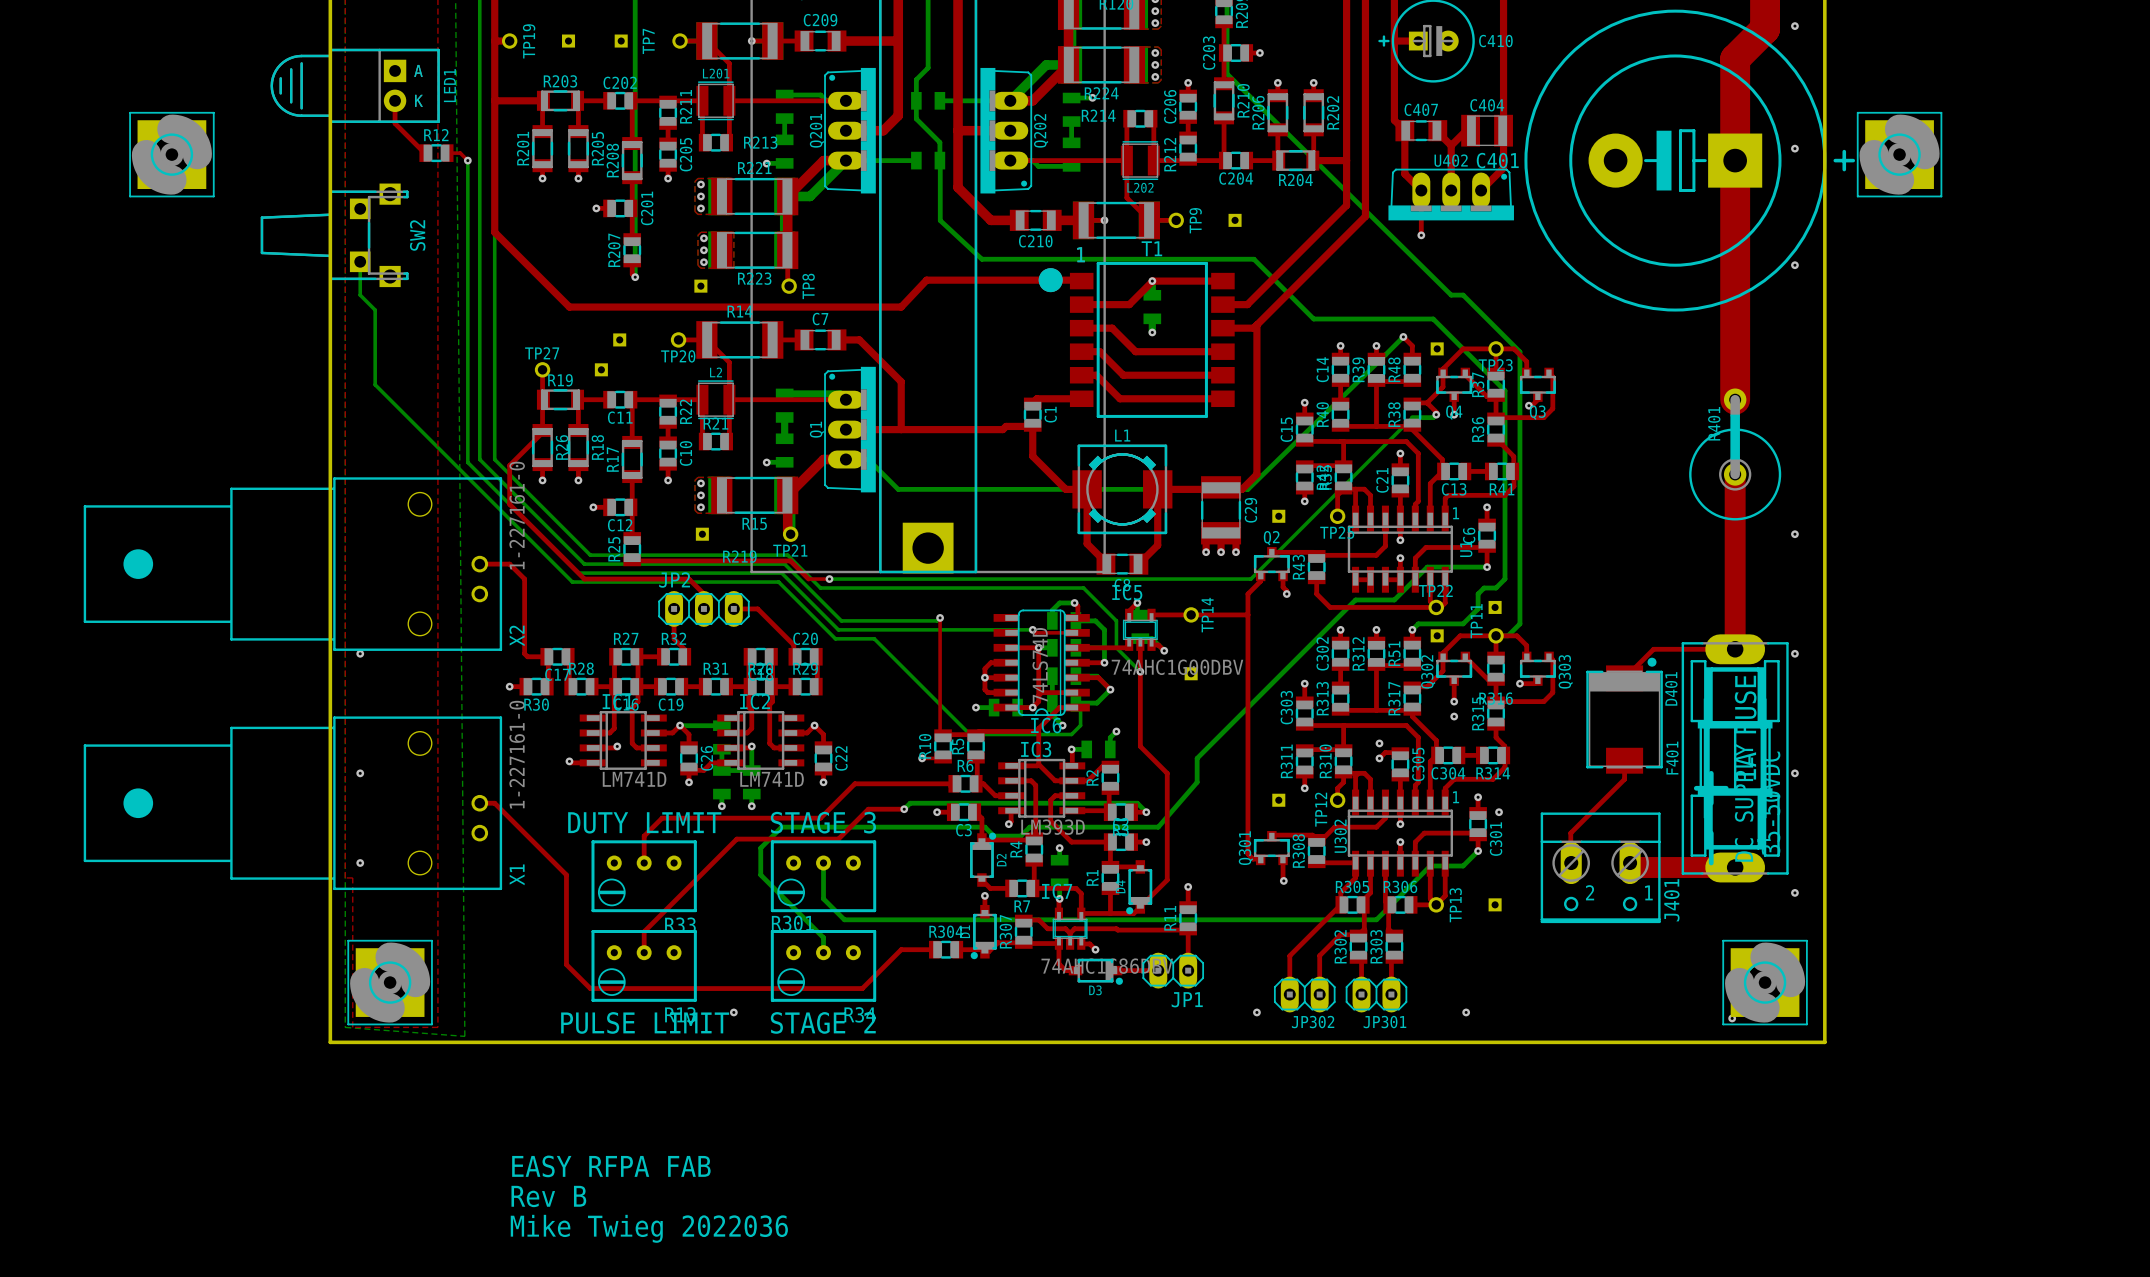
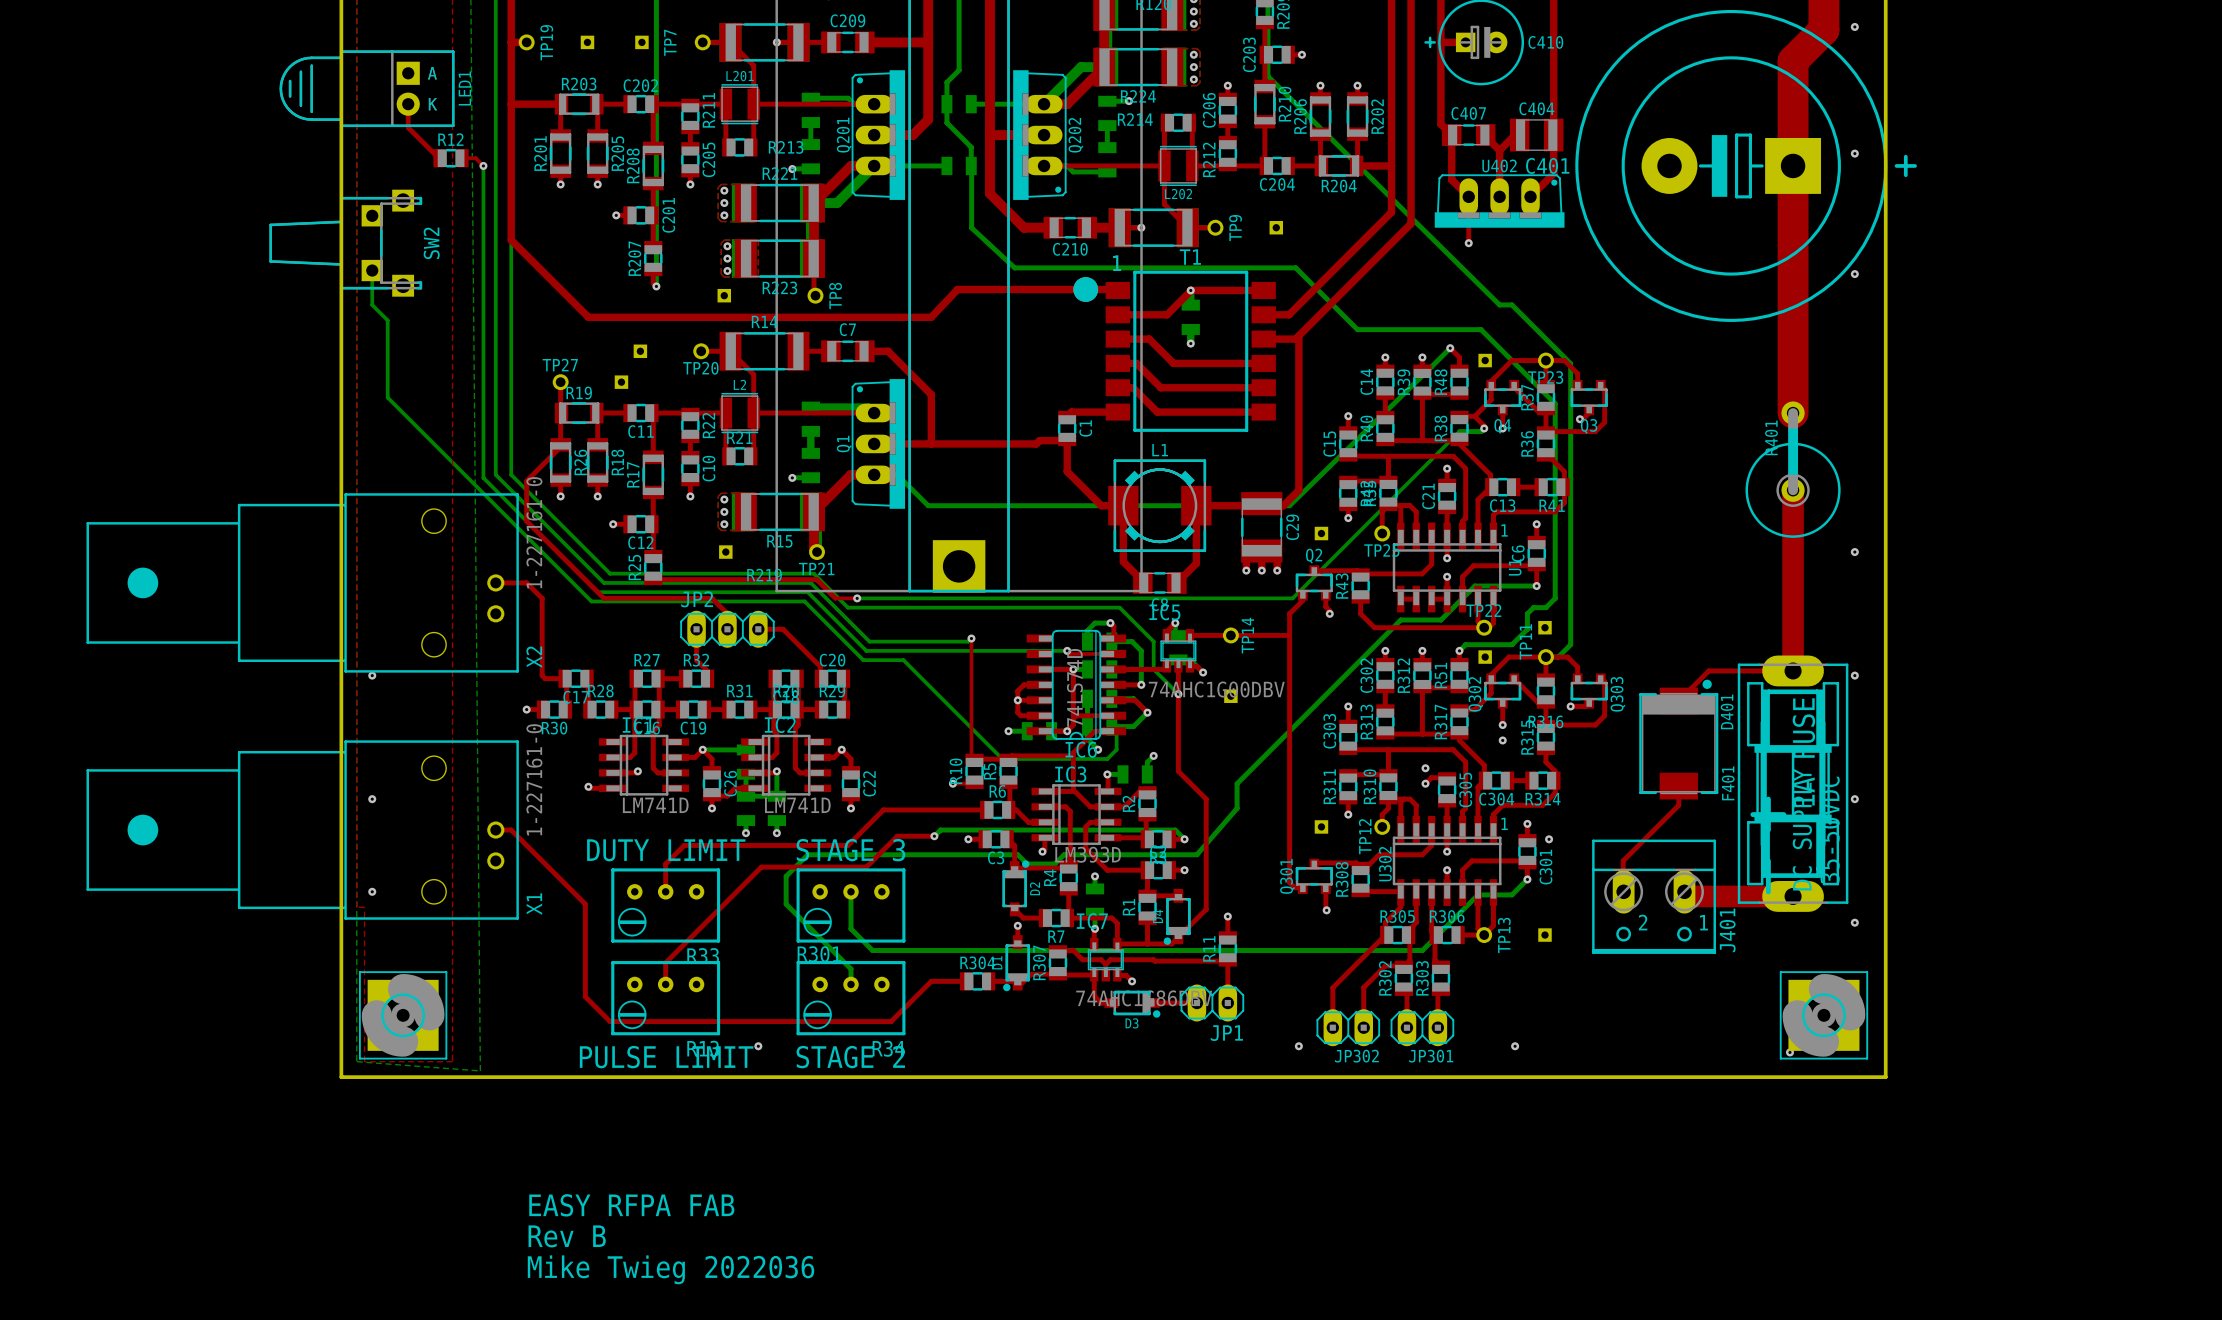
part: (171, 154) -> none
part: (1899, 154) -> none

